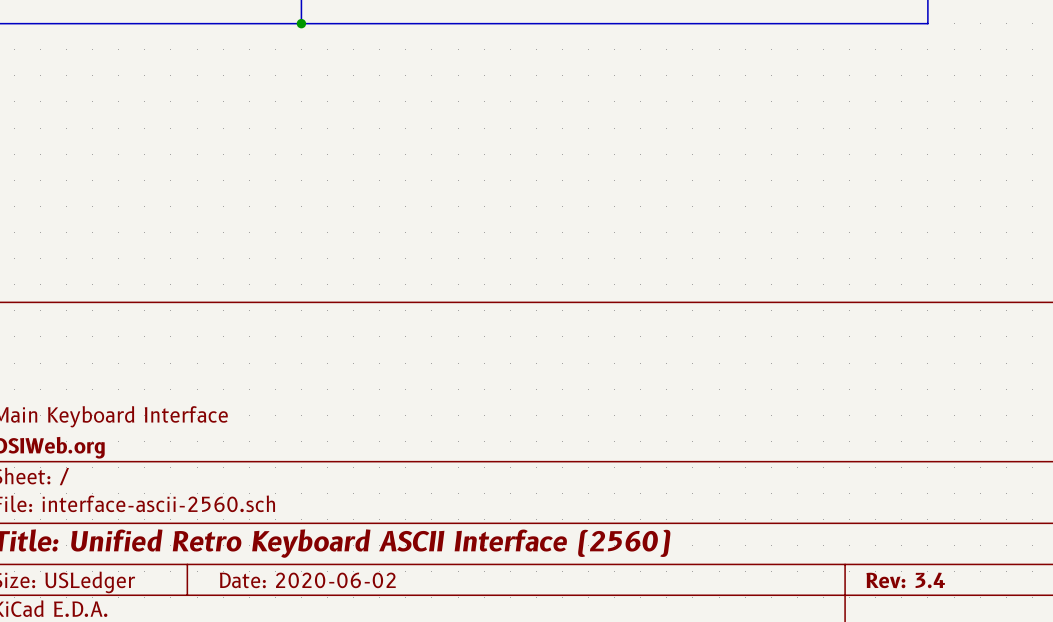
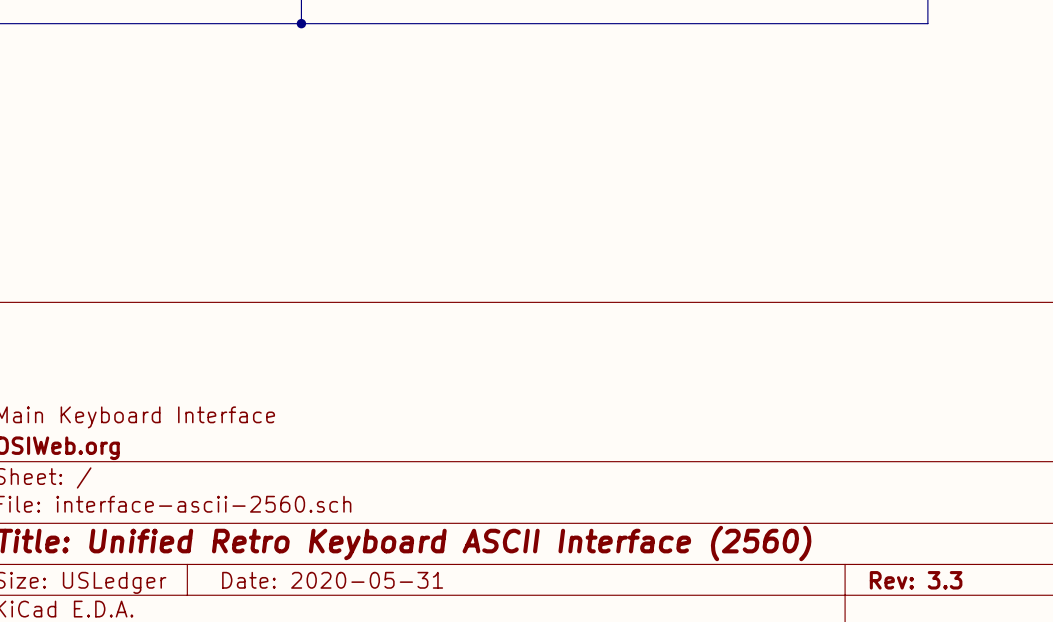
title block: Date: 2020-06-02 (307, 580) -> Date: 2020-05-31 (332, 580)
title block: Rev: 3.4 (905, 580) -> Rev: 3.3 (916, 580)

